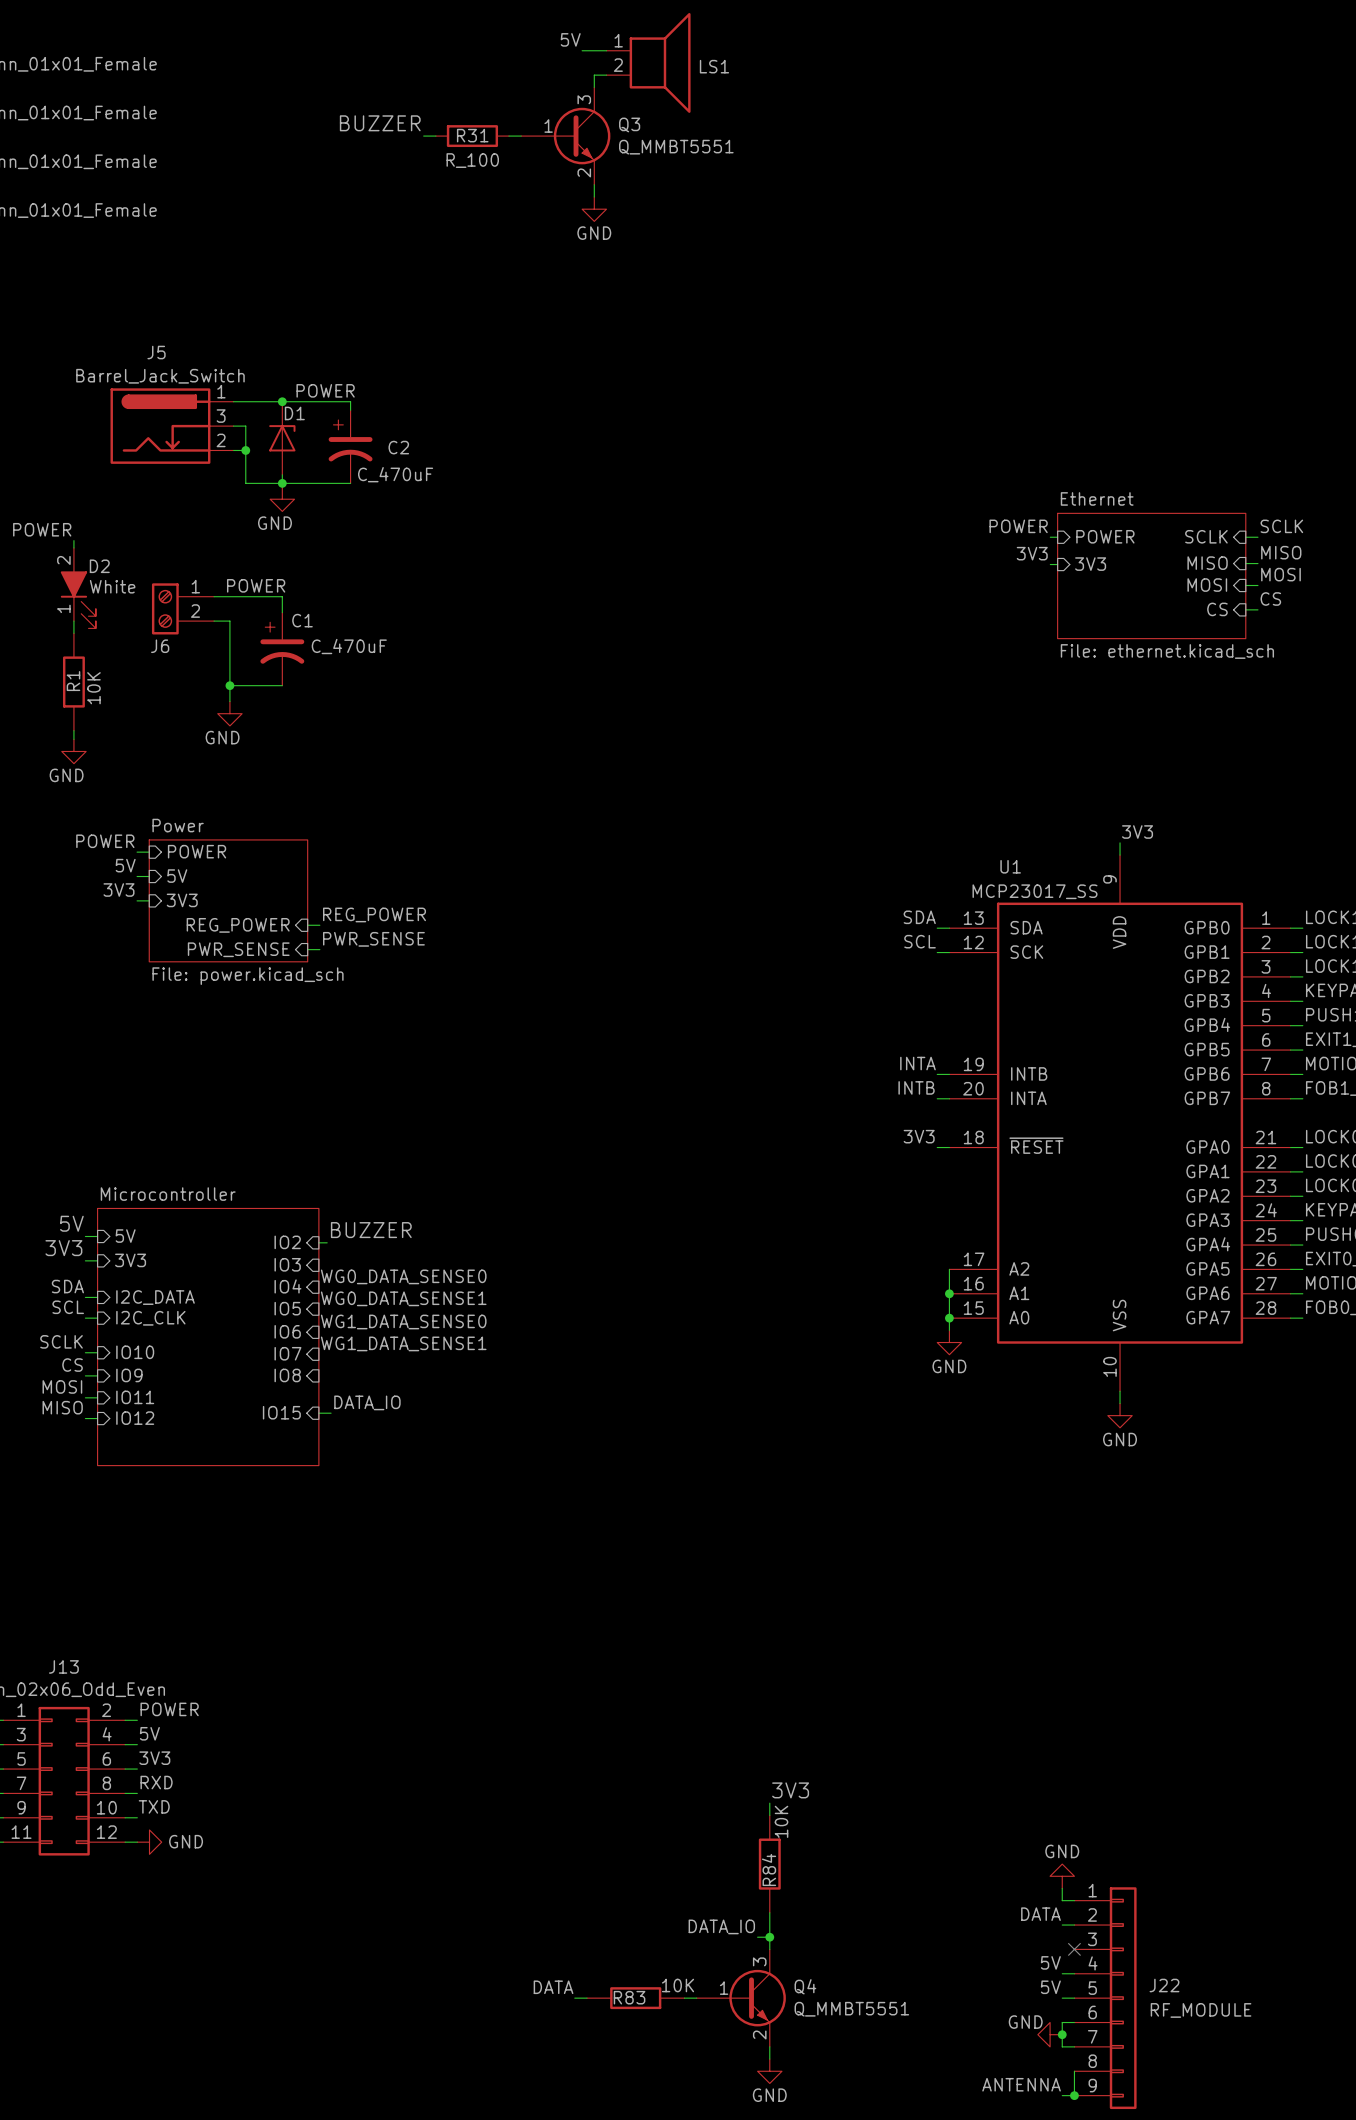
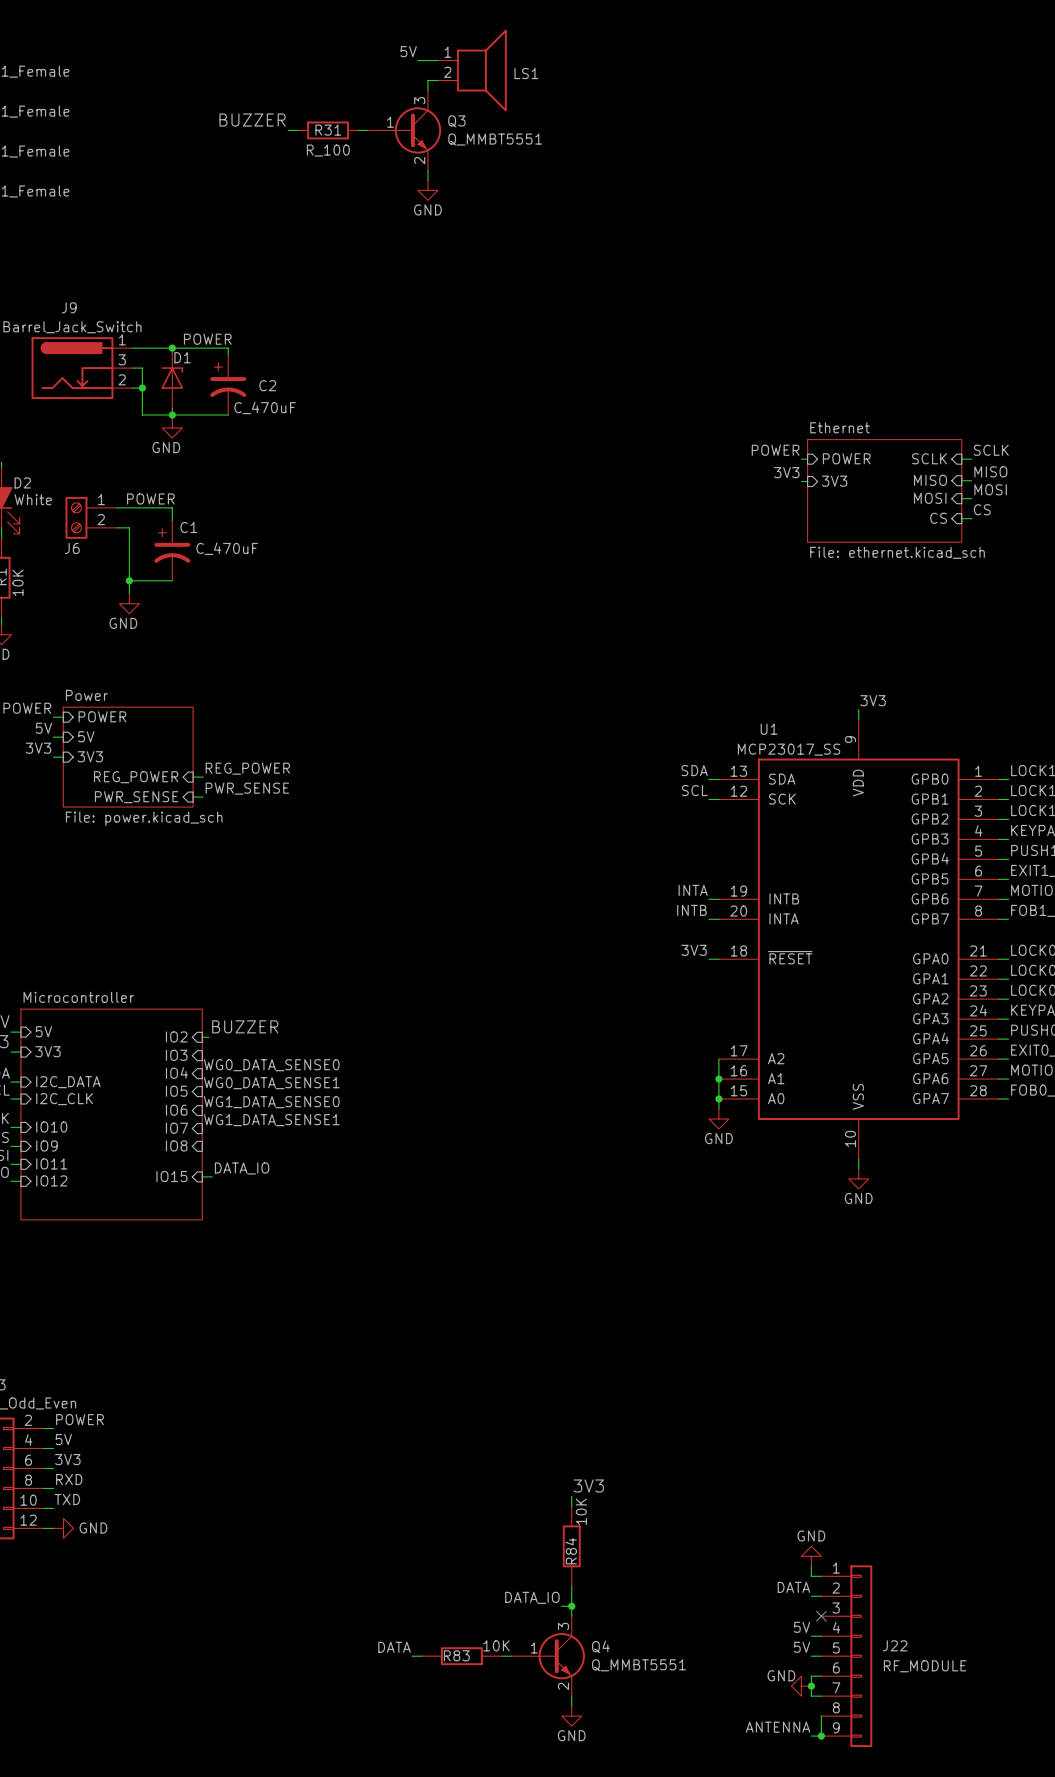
J5 name: J5 (156, 352) -> J9 (69, 307)

